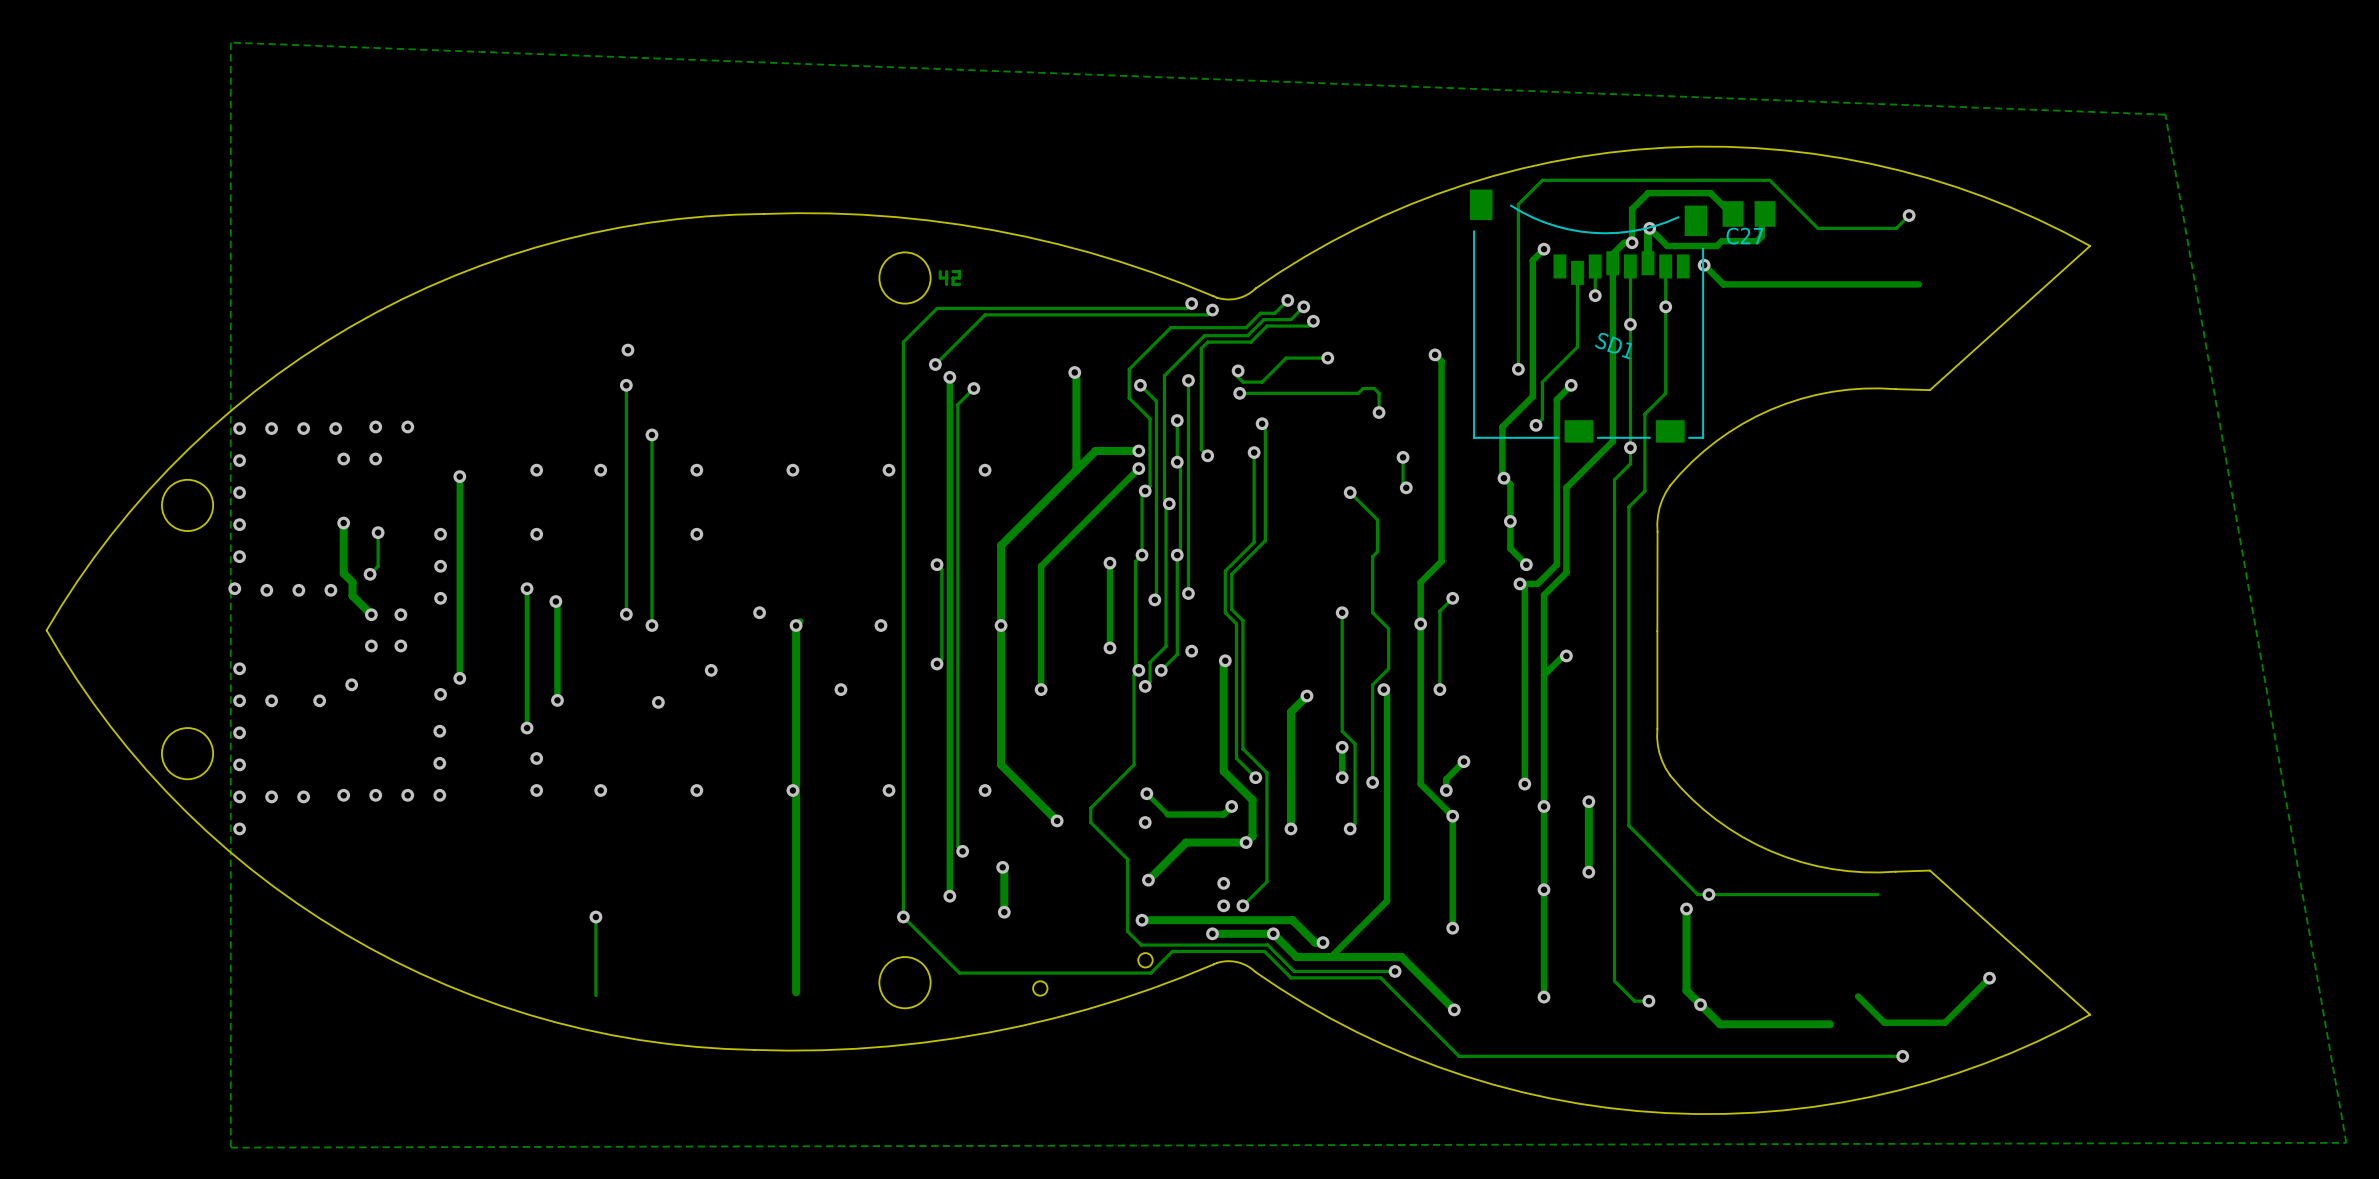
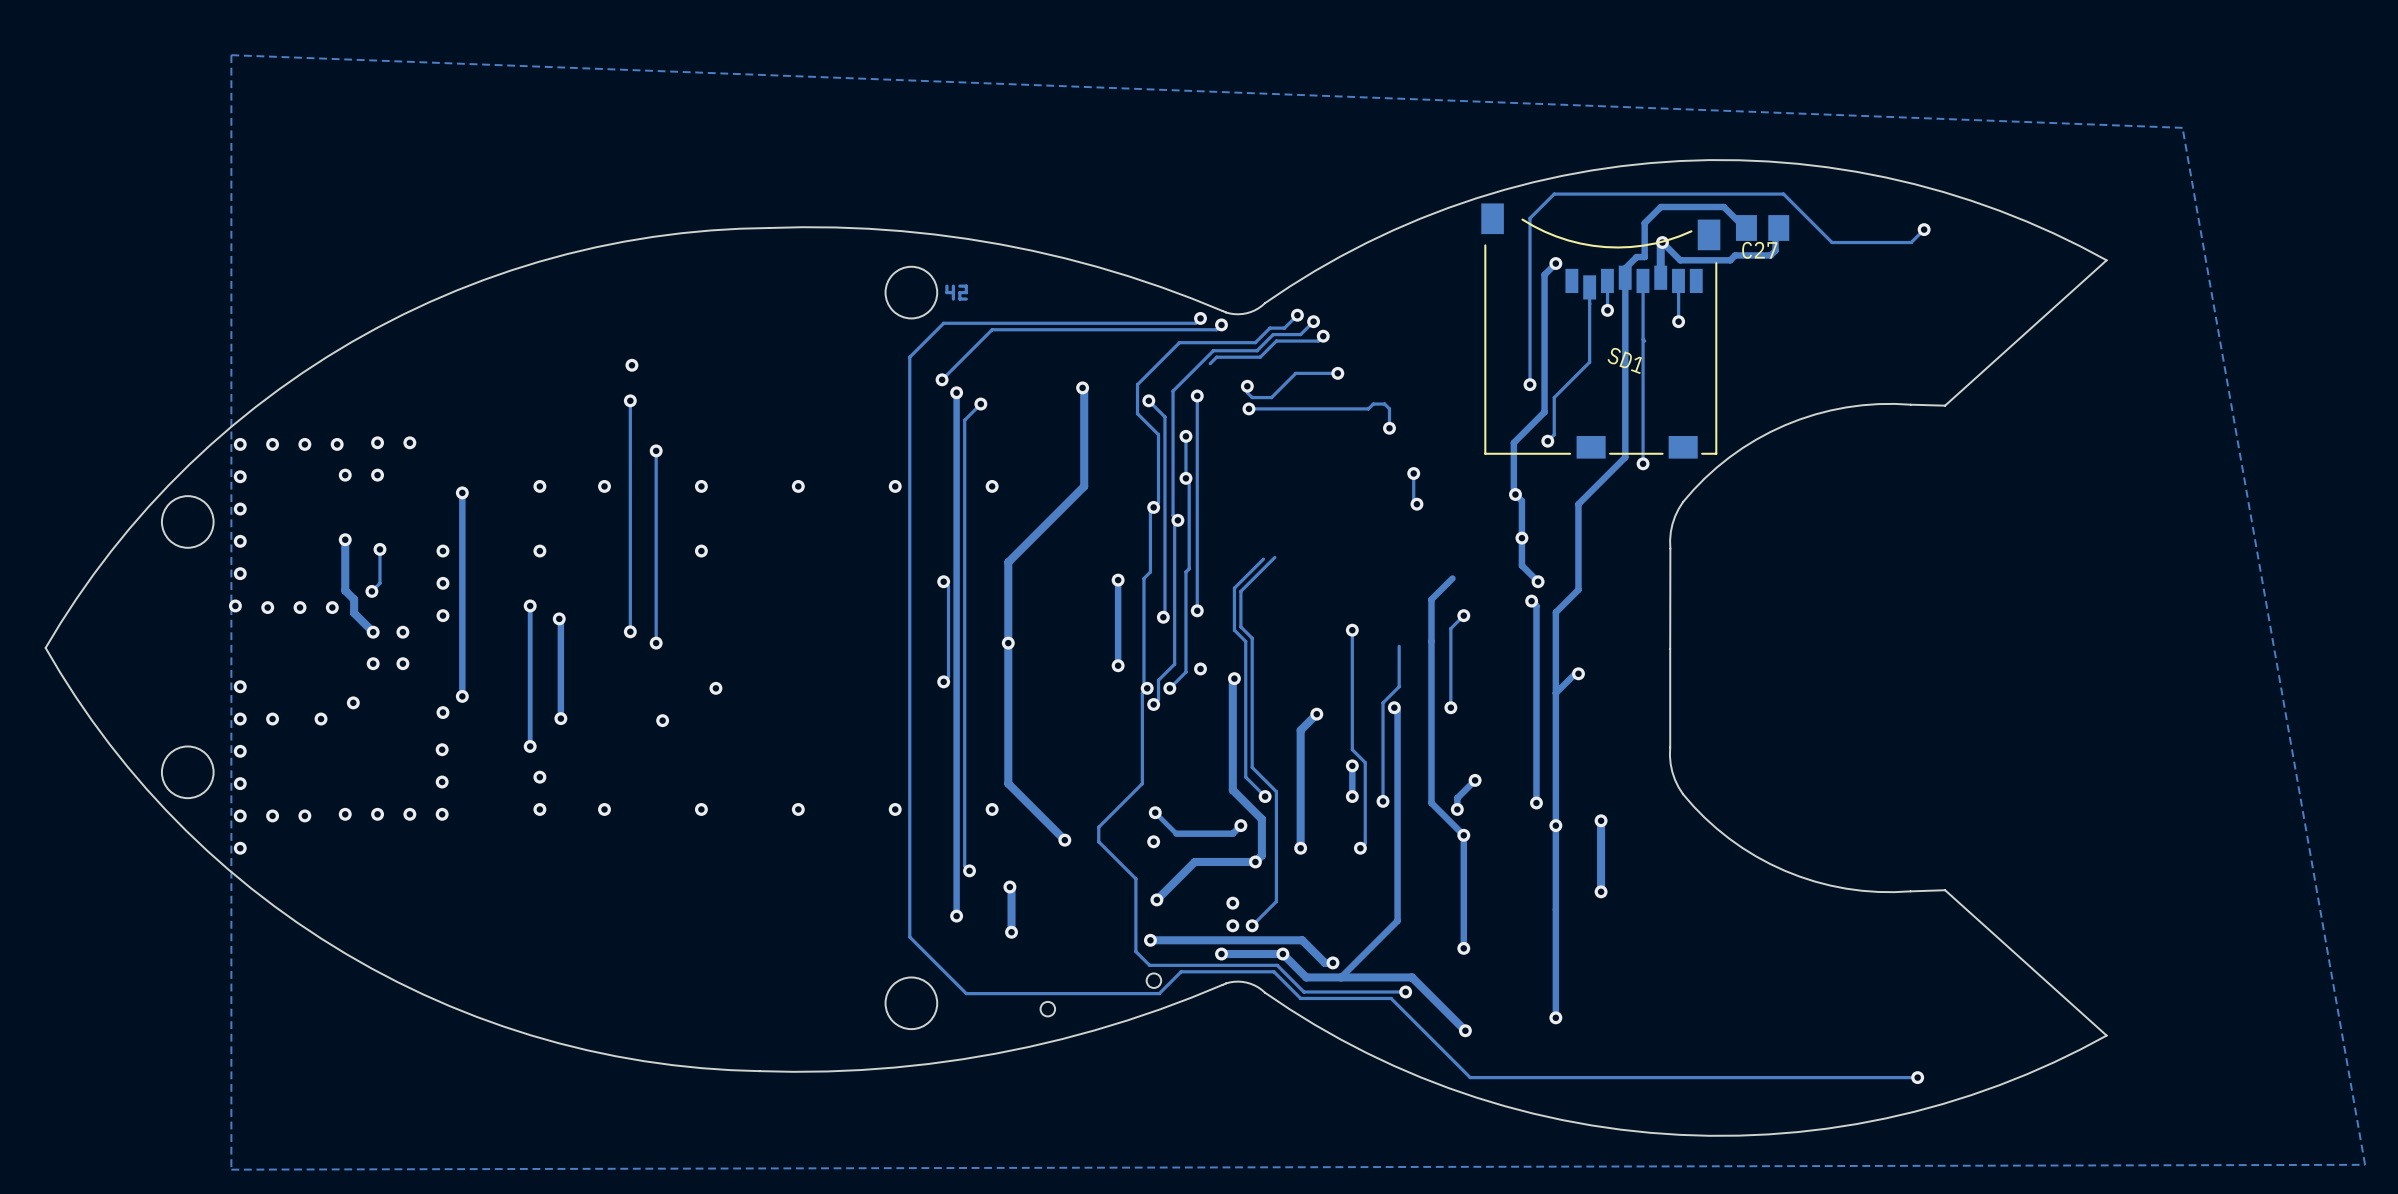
via: (1632, 242) -> none
track: (1704, 265) (1723, 284) (1918, 284) -> none
via: (1704, 265) -> none
track: (1665, 306) (1665, 393) (1644, 414) (1644, 491) (1628, 507) (1628, 825) (1697, 894) (1878, 894) -> none
via: (1630, 324) -> none
track: (1201, 348) (1201, 449) (1207, 455) -> none
track: (1435, 354) (1441, 361) (1441, 561) -> none
via: (1435, 354) -> none
track: (1571, 385) (1556, 399) (1556, 564) (1537, 583) (1519, 583) -> none
via: (1571, 385) -> none
track: (1262, 423) (1265, 426) (1265, 540) -> none
via: (1262, 423) -> none
track: (1630, 447) (1630, 463) (1614, 479) (1614, 981) (1634, 1001) (1648, 1001) -> none
track: (1138, 450) (1095, 450) (1076, 470) -> none
via: (1138, 450) -> none
track: (1254, 452) (1254, 542) -> none
via: (1254, 452) -> none
via: (1207, 455) -> none
track: (1138, 468) (1041, 566) (1041, 689) -> none
via: (1138, 468) -> none
track: (1350, 492) (1377, 519) (1377, 551) (1372, 556) (1372, 612) (1388, 628) -> none
via: (1350, 492) -> none
via: (1142, 555) -> none
via: (1177, 555) -> none
via: (759, 612) -> none
track: (800, 621) (796, 625) (796, 992) -> none
via: (1420, 623) -> none
via: (796, 625) -> none
via: (880, 625) -> none
via: (840, 689) -> none
via: (1041, 689) -> none
via: (1544, 889) -> none
via: (1708, 894) -> none
track: (1686, 909) (1686, 990) (1720, 1024) (1830, 1024) -> none
via: (1686, 909) -> none
track: (595, 917) (595, 995) -> none
via: (595, 917) -> none
via: (903, 917) -> none
track: (1989, 978) (1945, 1022) (1884, 1022) (1858, 996) -> none
via: (1989, 978) -> none
via: (1648, 1001) -> none
via: (1700, 1004) -> none

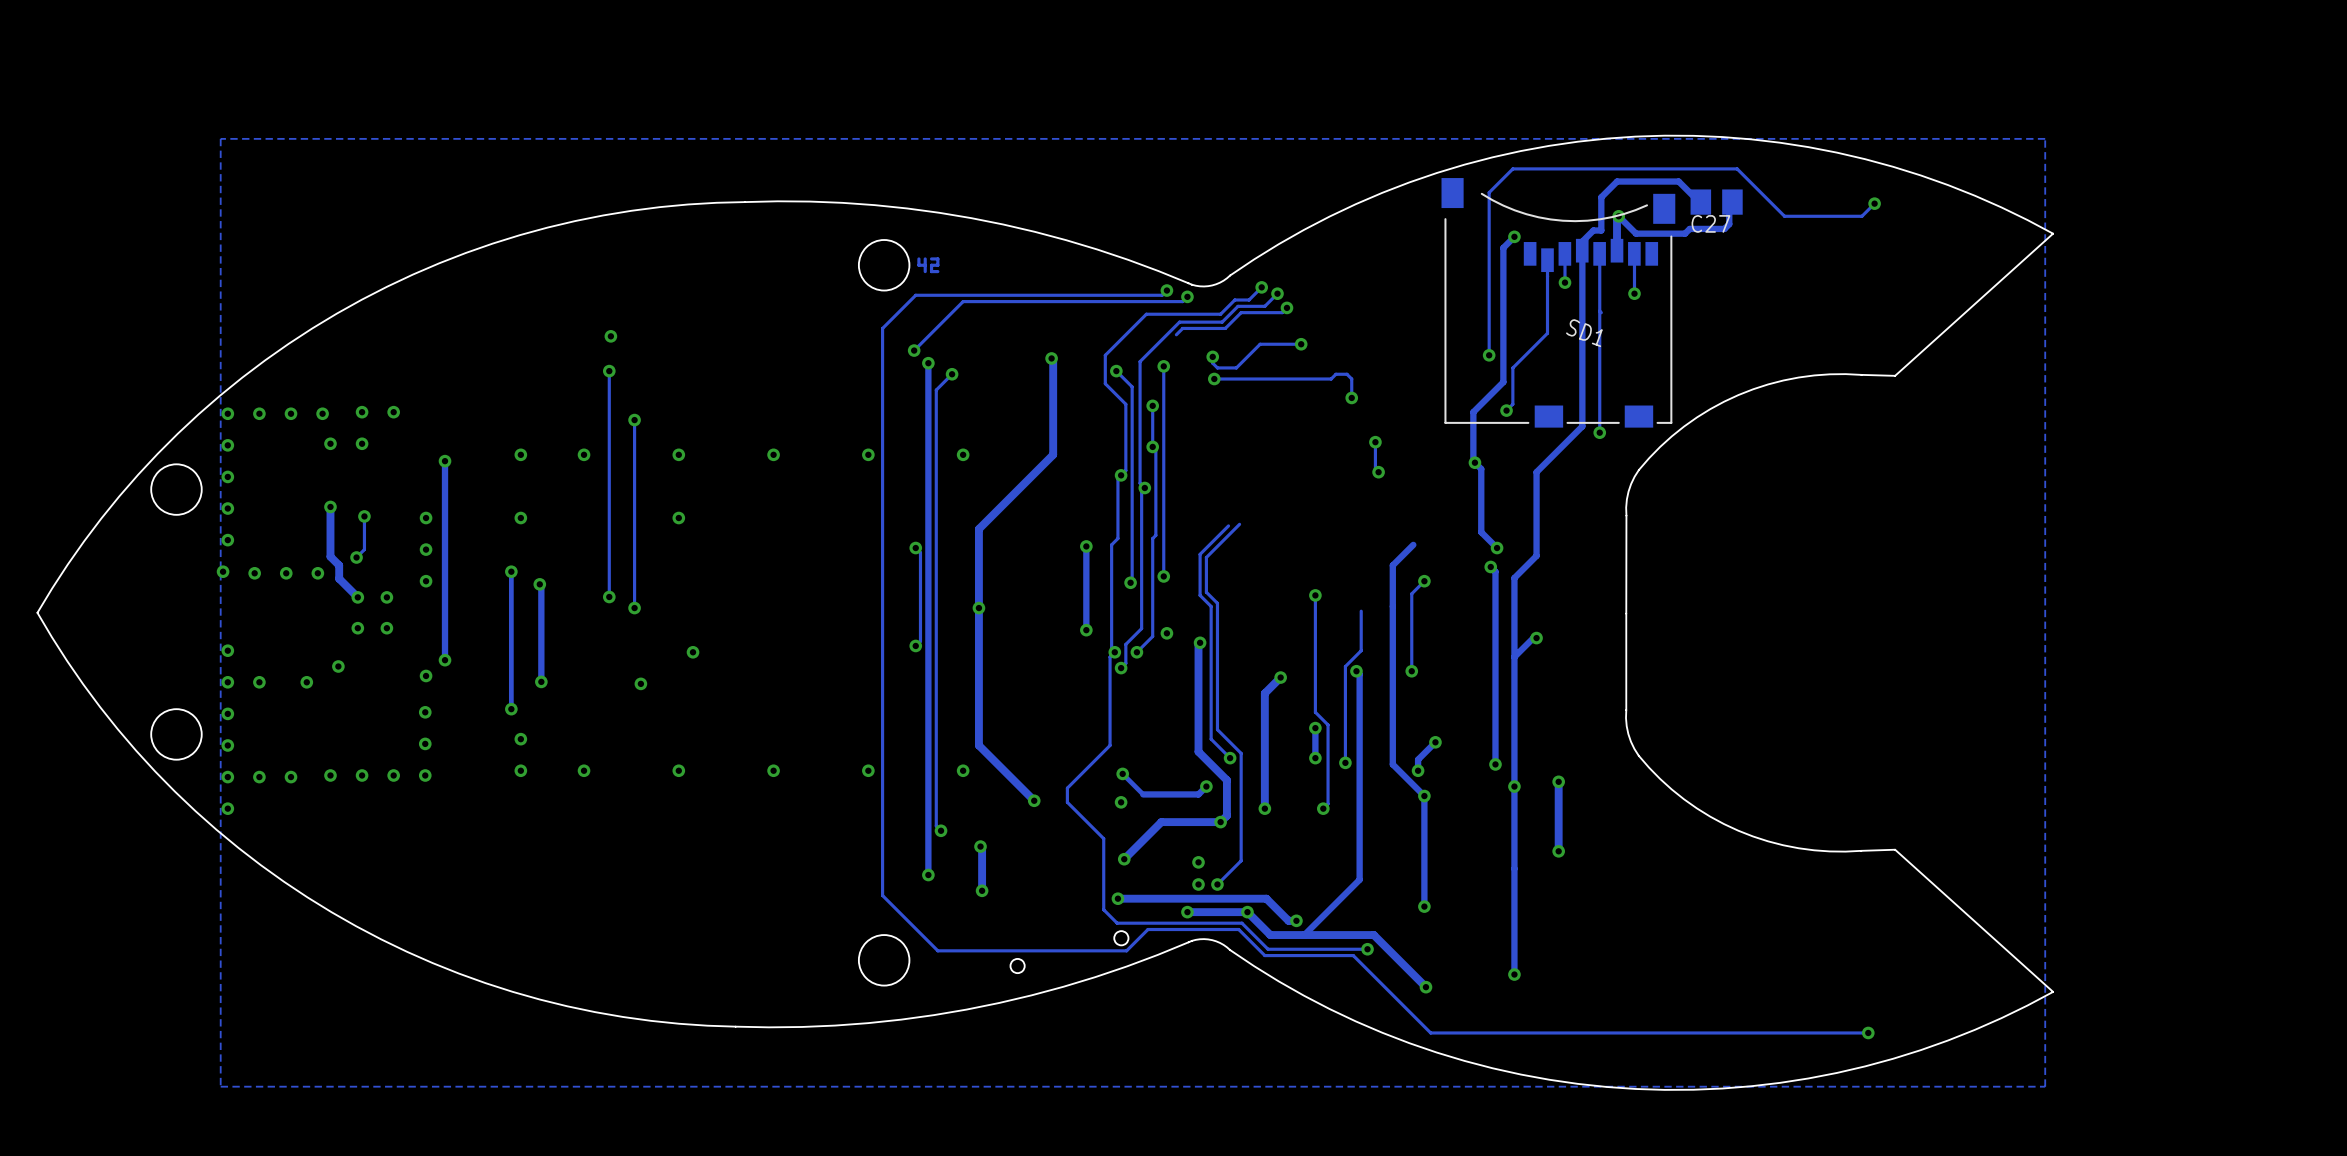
zone outline: (231, 55) (231, 1169) (2365, 1164) (2182, 127) (231, 55) -> (2045, 138) (2045, 1086) (220, 1086) (220, 138) (2045, 138)
via: (1521, 538) -> none

